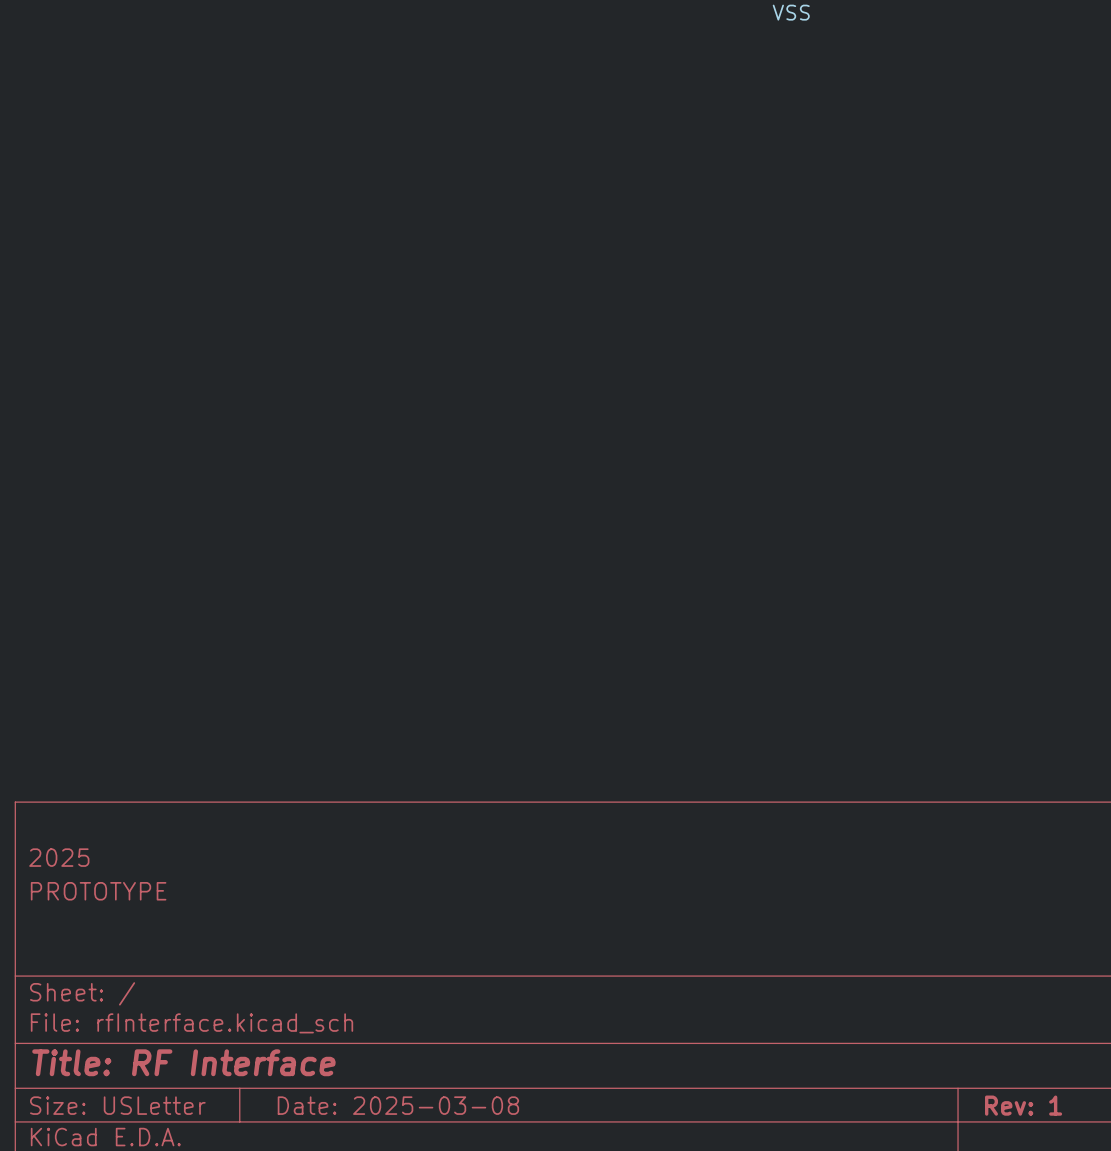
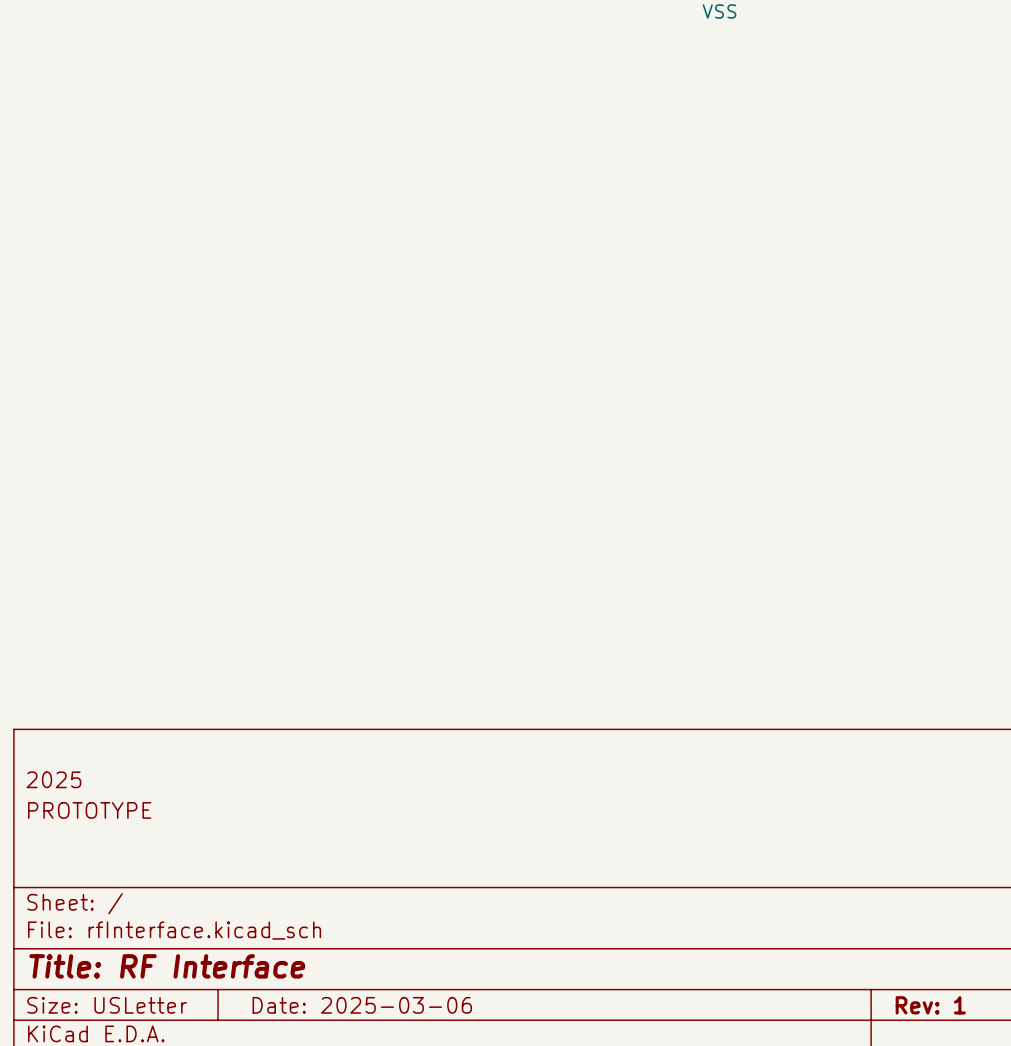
title block: Date: 2025-03-08 (398, 1105) -> Date: 2025-03-06 (362, 1005)

